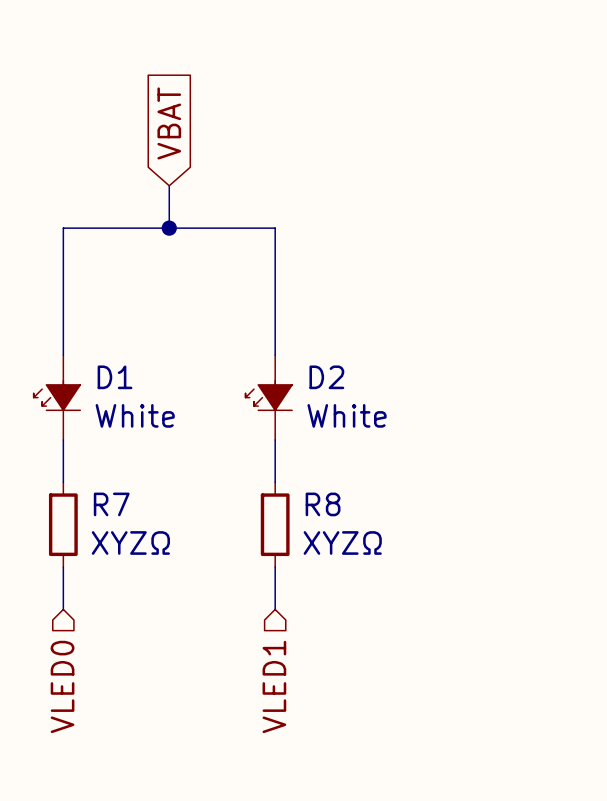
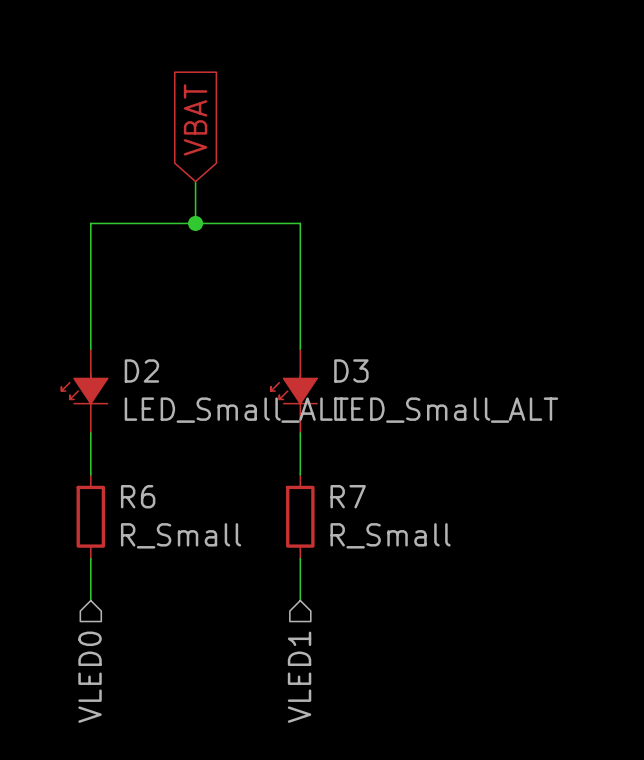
D1 name: D1 (115, 377) -> D2 (141, 371)
D2 name: D2 (326, 377) -> D3 (351, 371)
D1 value: White (135, 415) -> LED_Small_ALT (236, 410)
D2 value: White (347, 415) -> LED_Small_ALT (446, 410)
R7 name: R7 (111, 504) -> R6 (138, 496)
R8 name: R8 (323, 504) -> R7 (348, 496)
R7 value: XYZΩ (130, 542) -> R_Small (181, 535)
R8 value: XYZΩ (342, 542) -> R_Small (390, 535)

